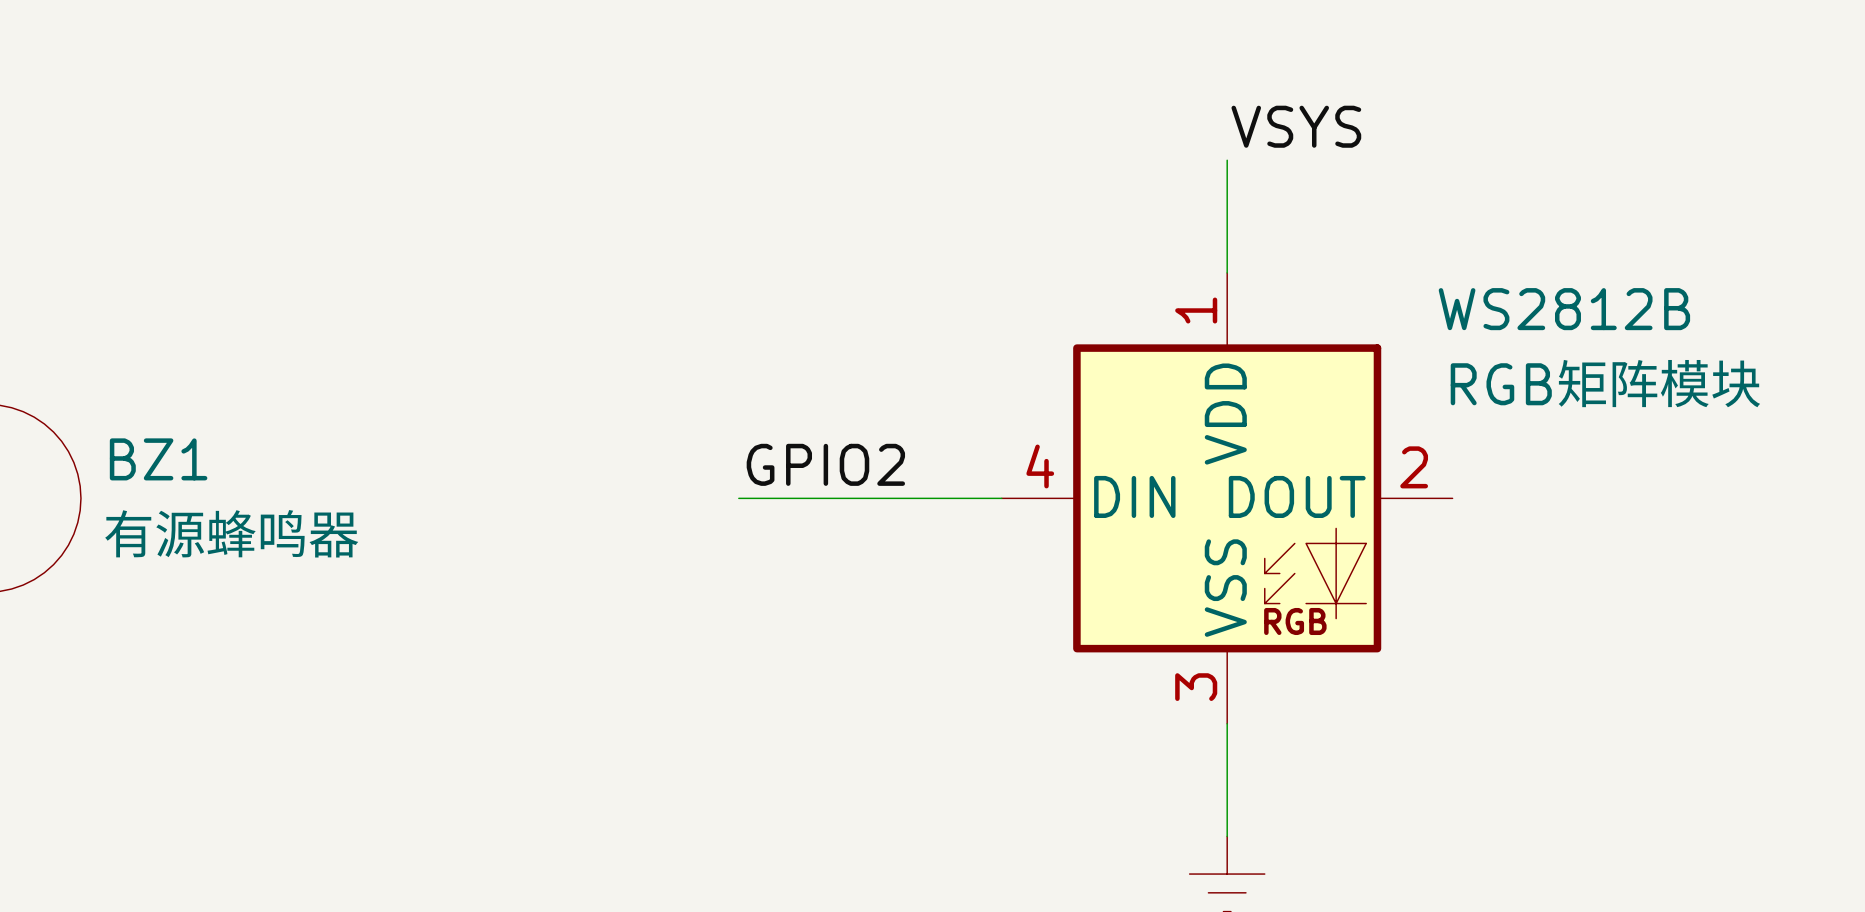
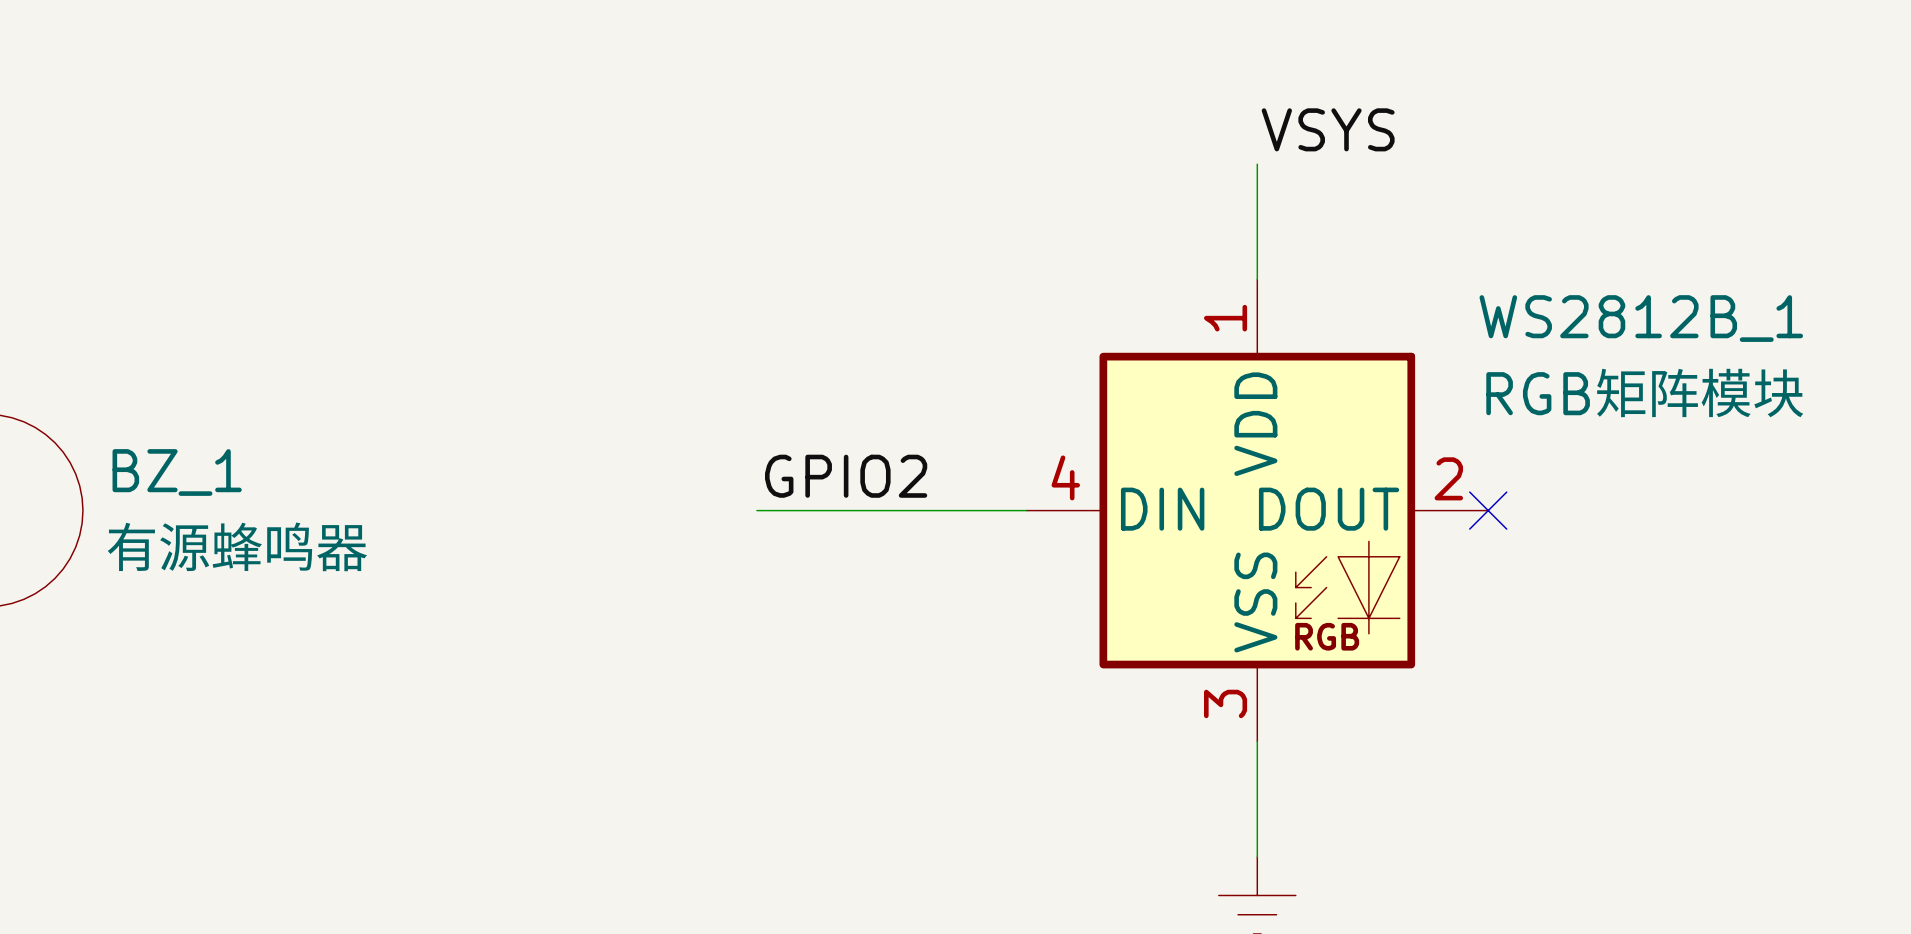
WS2812B name: WS2812B (1564, 309) -> WS2812B_1 (1641, 318)
BZ1 name: BZ1 (158, 459) -> BZ_1 (177, 472)
no-connect mark: none -> (1488, 510)

